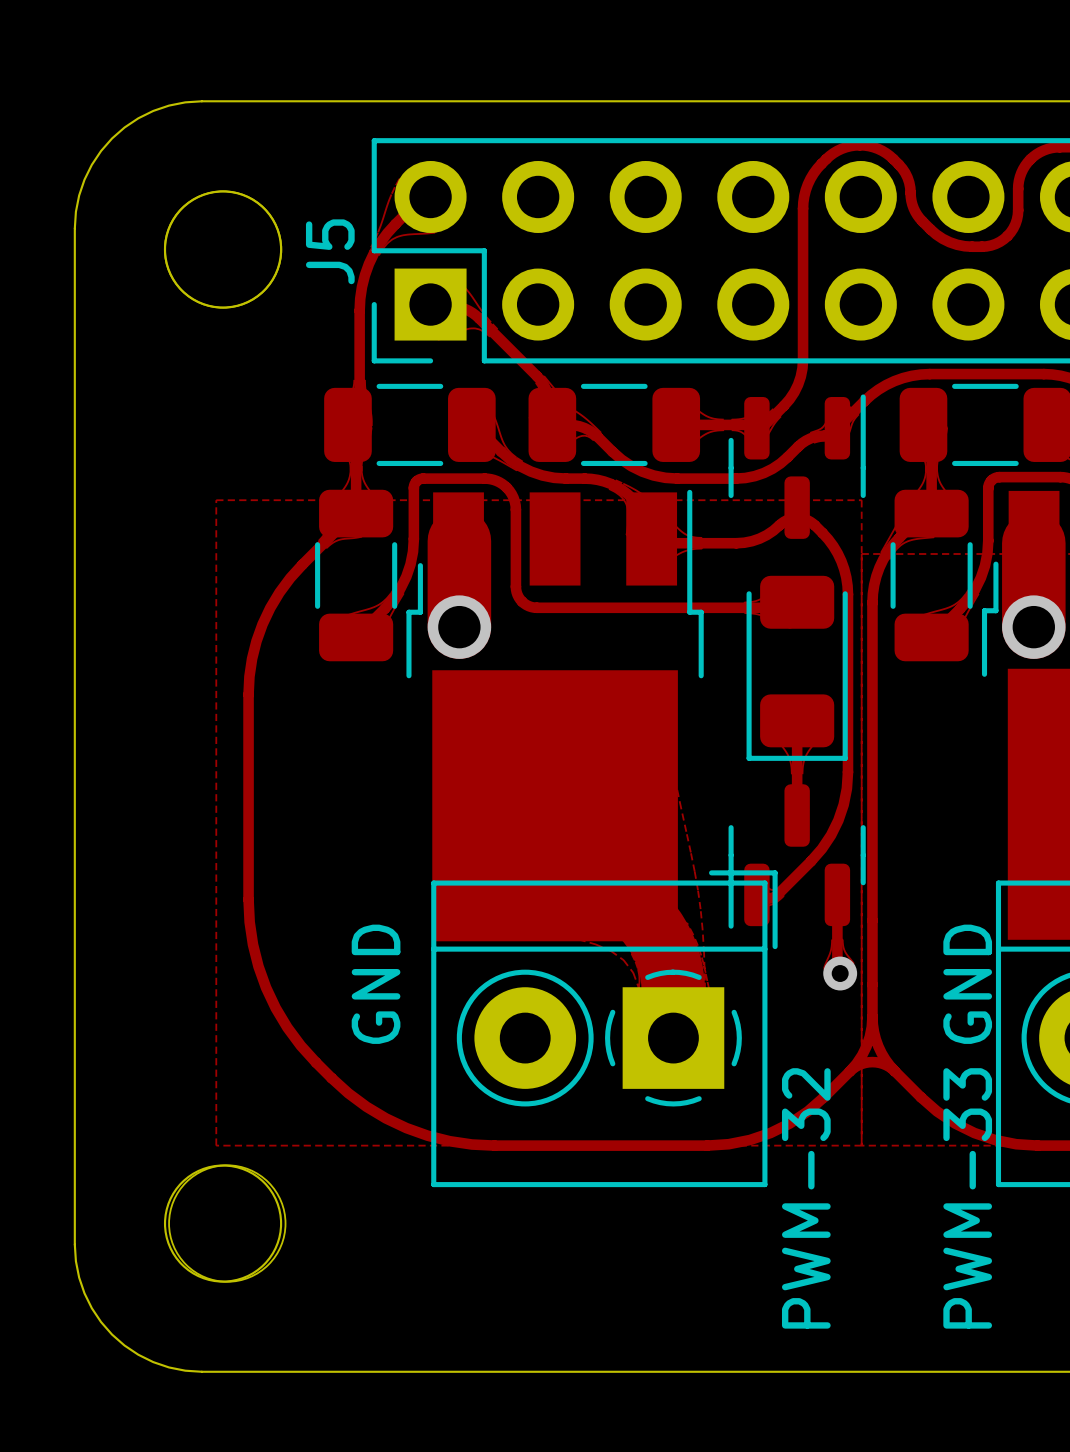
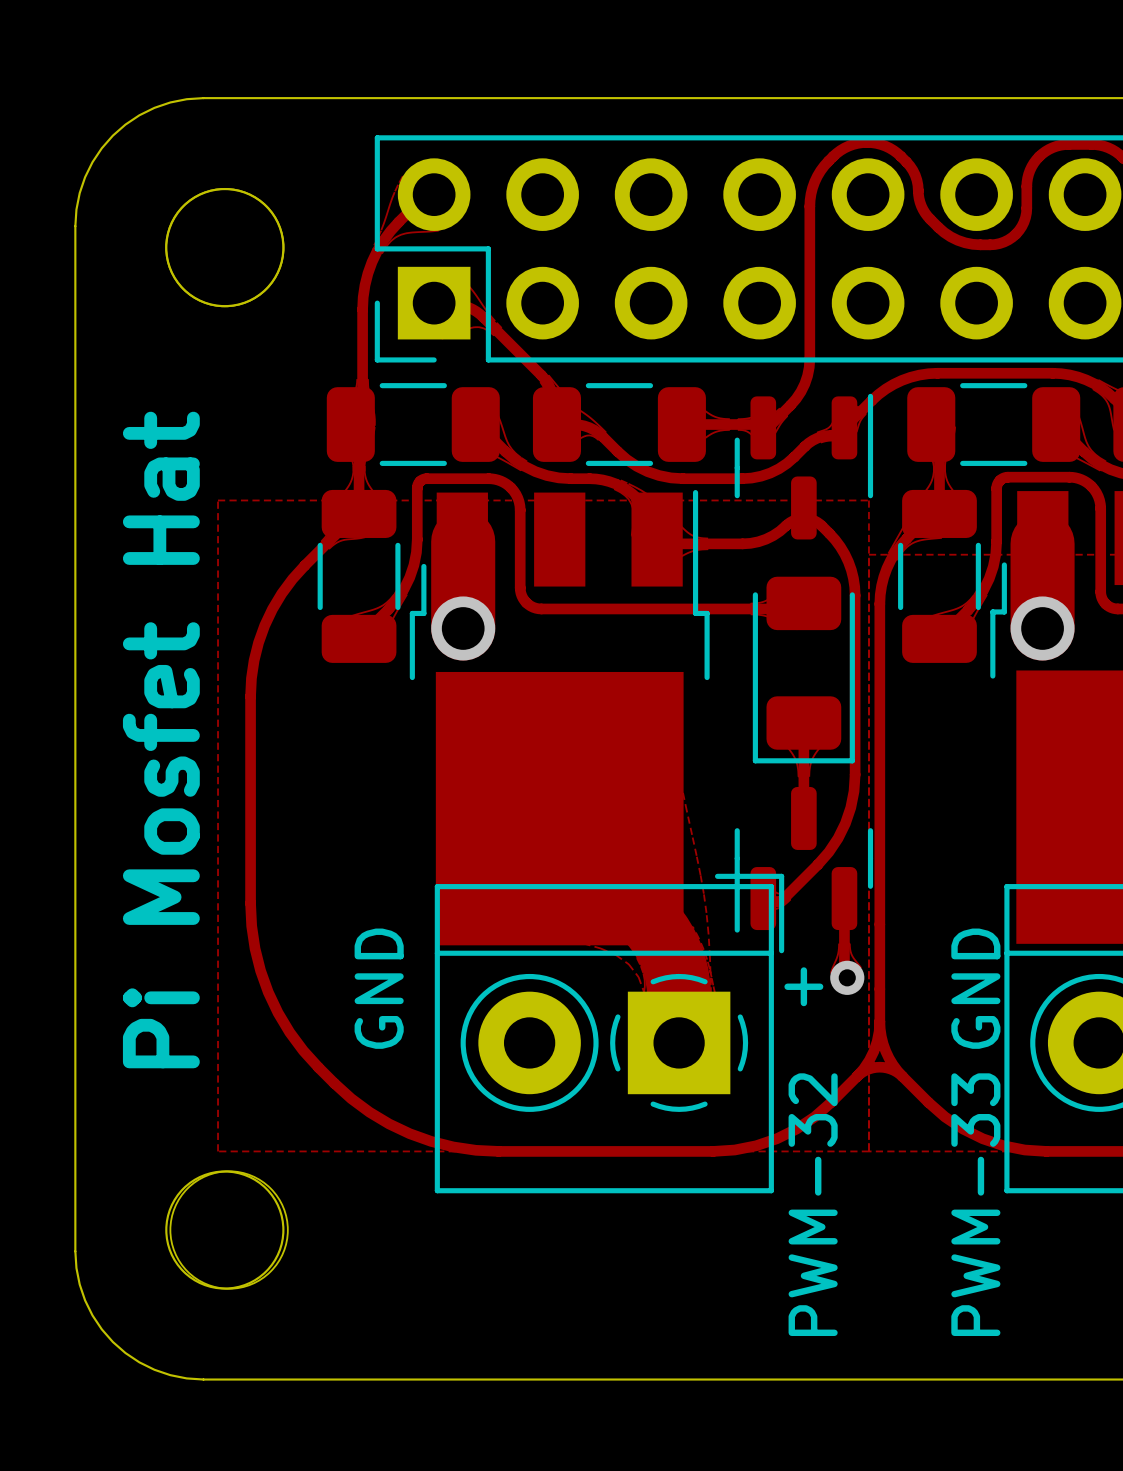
J5 name: J5 (330, 251) -> none
text: none -> Pi Mosfet Hat (161, 740)
text: none -> + (803, 986)

